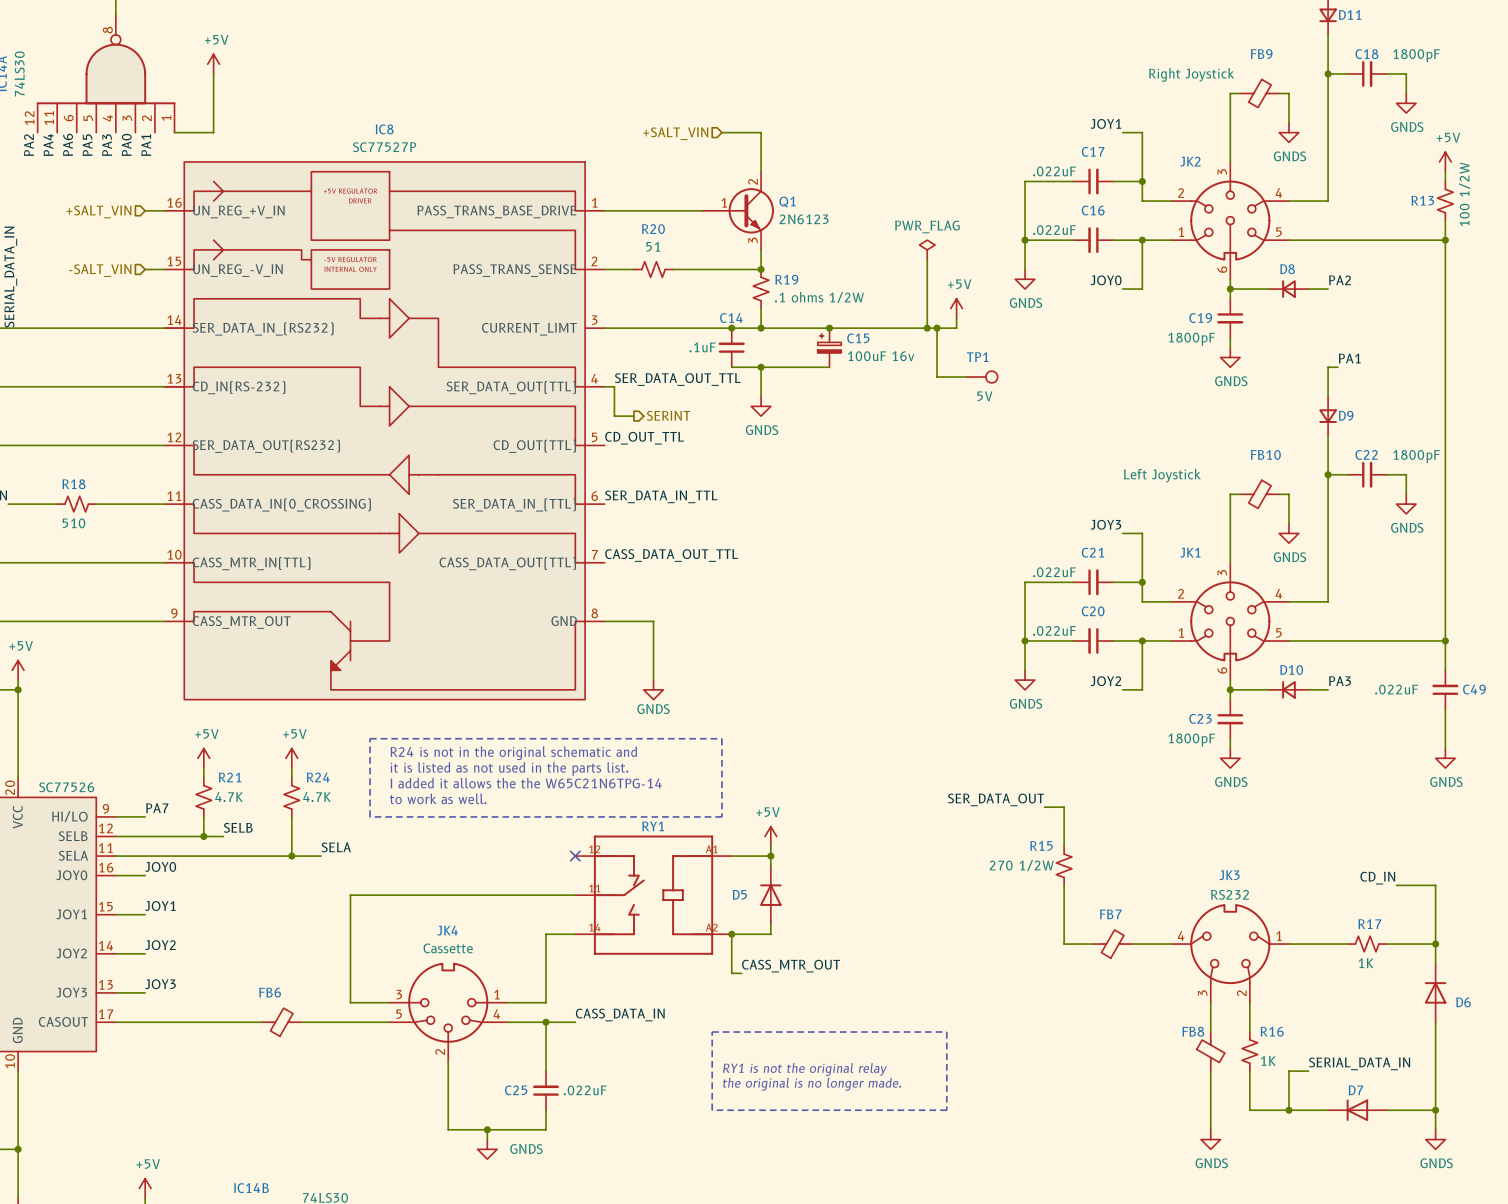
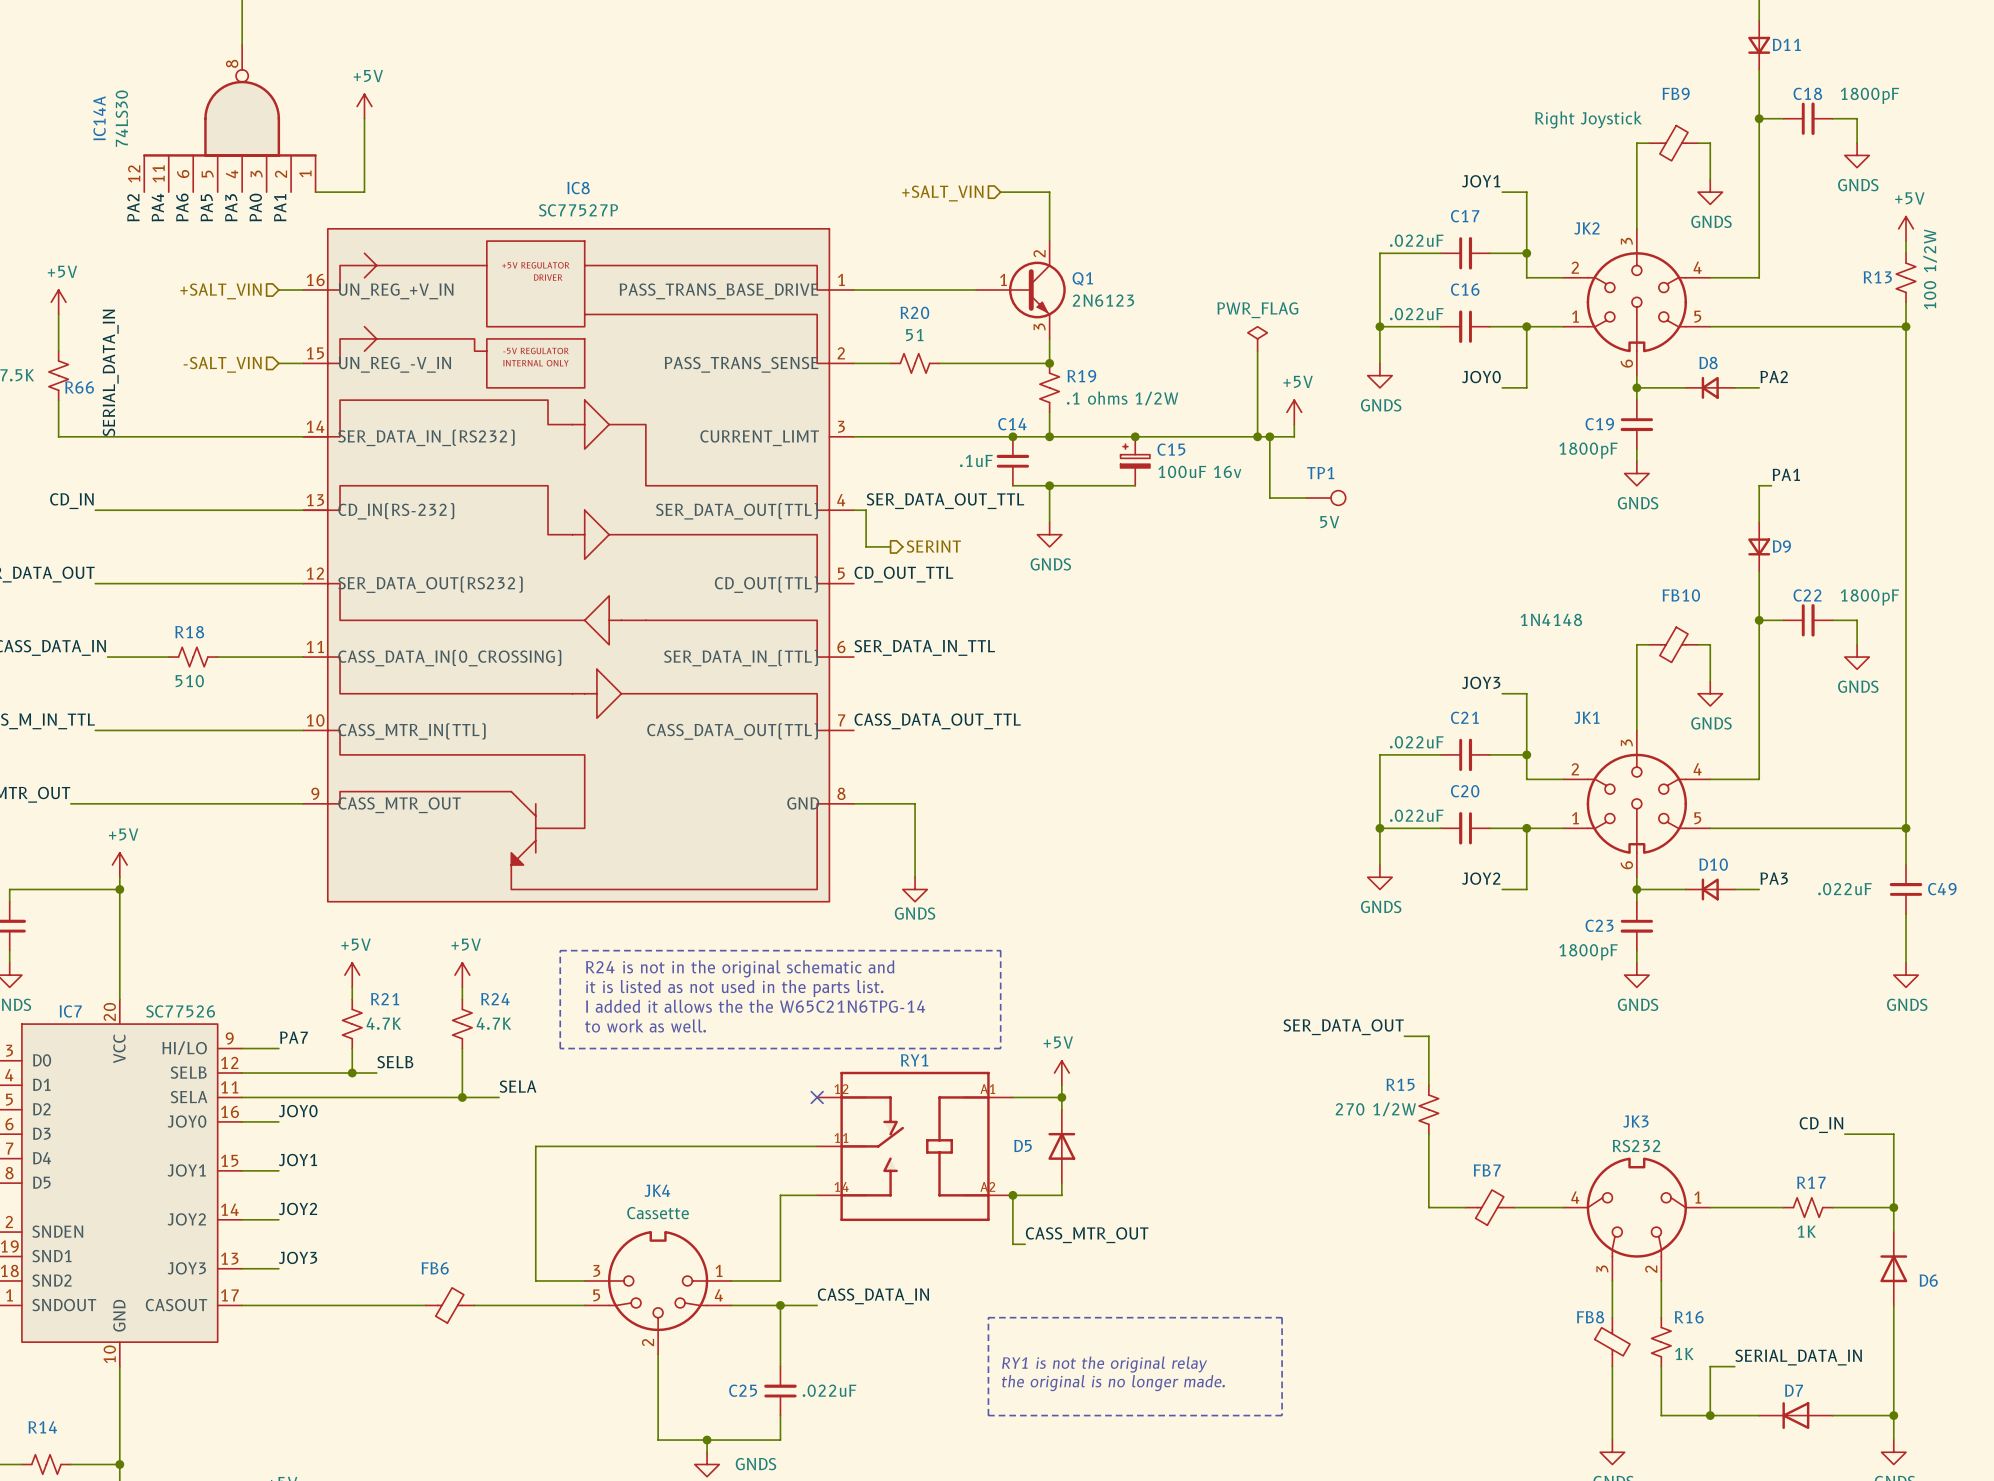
JK1 value: Left Joystick (1162, 475) -> 1N4148 (1551, 619)

